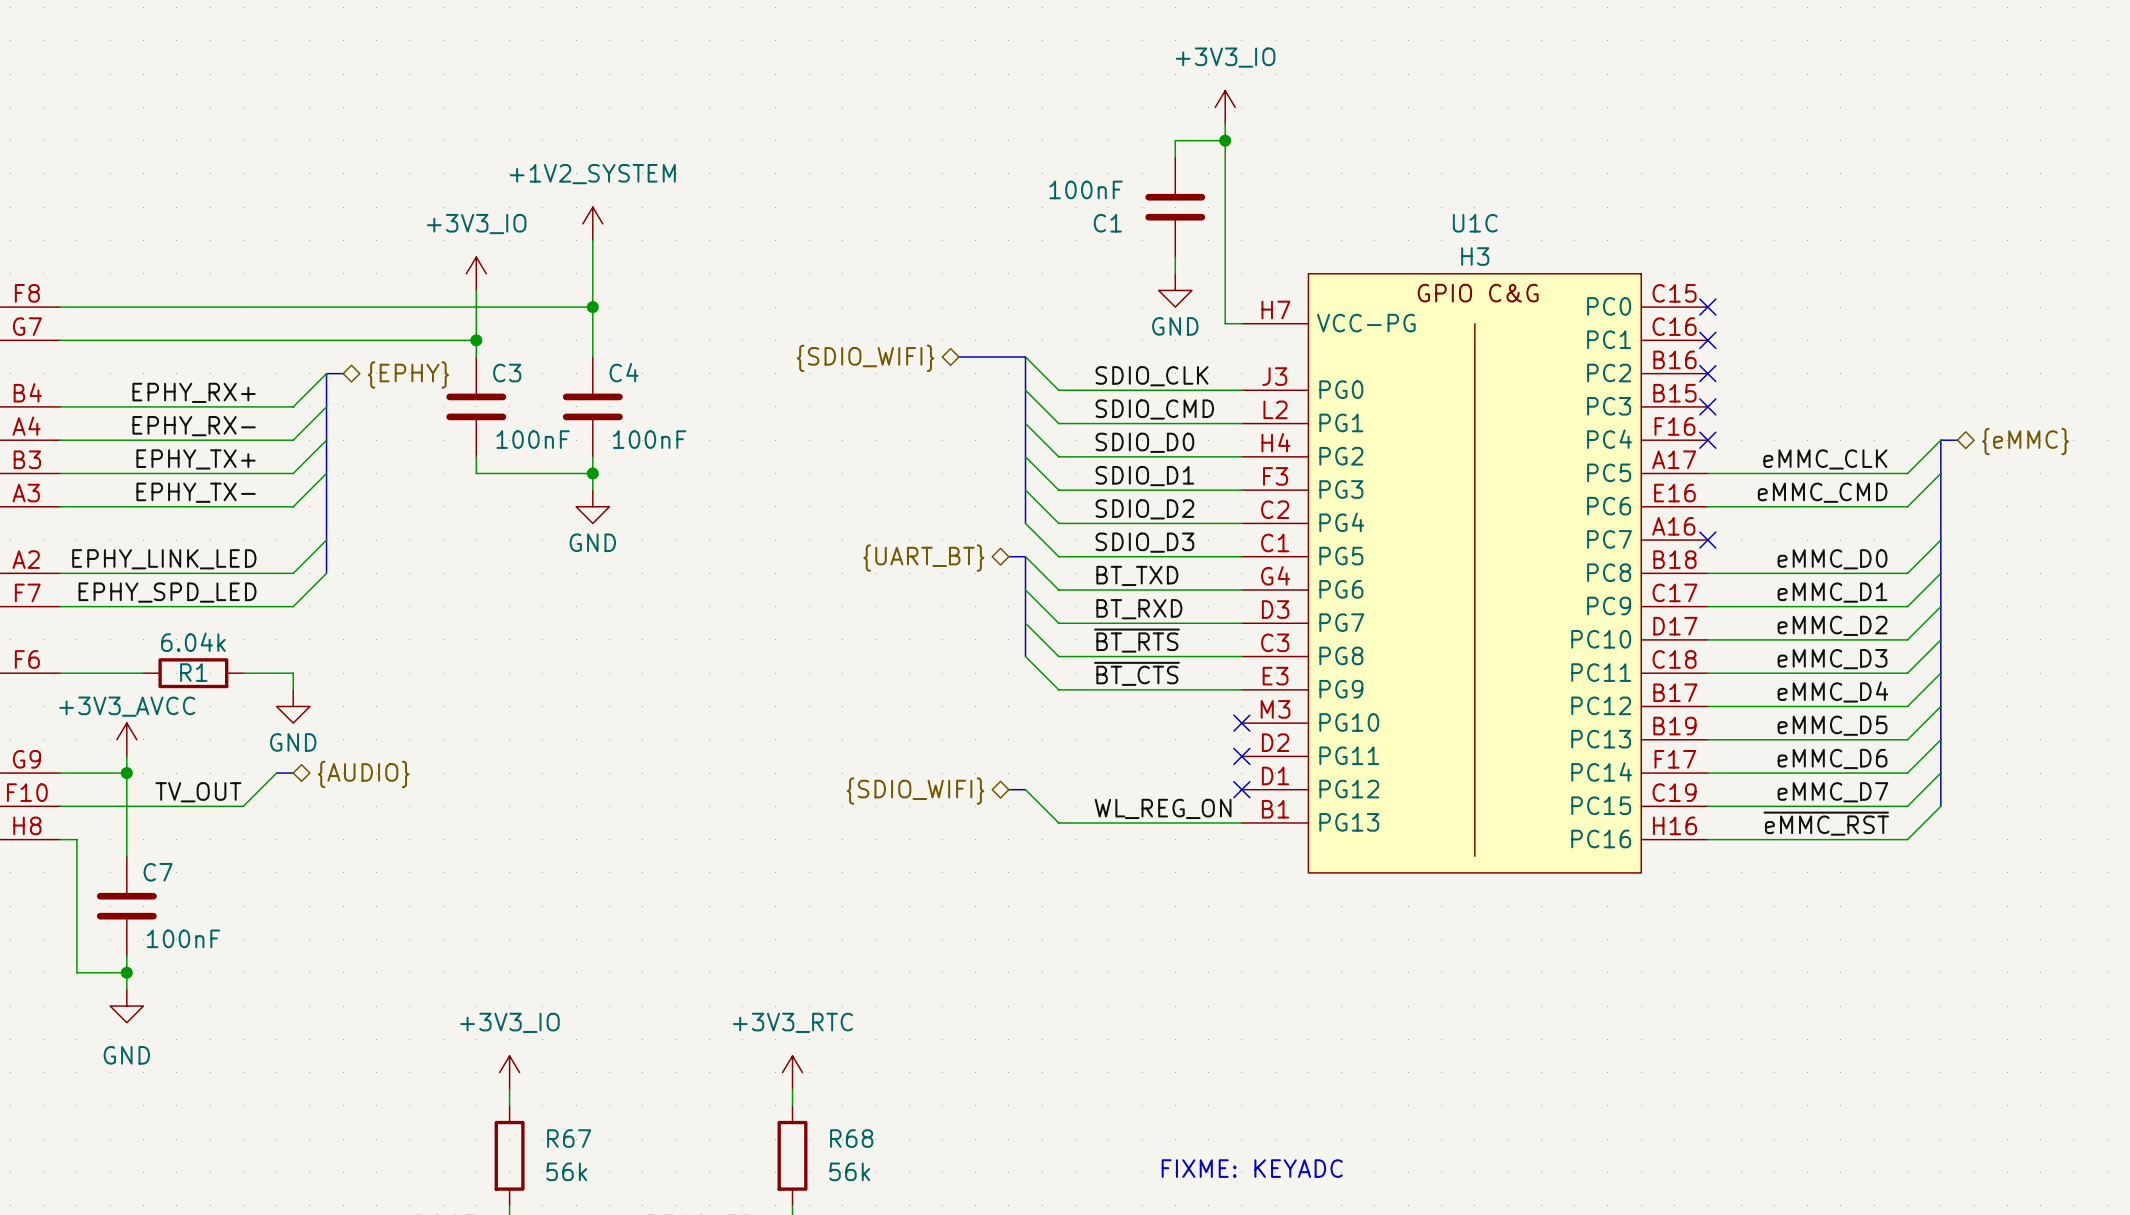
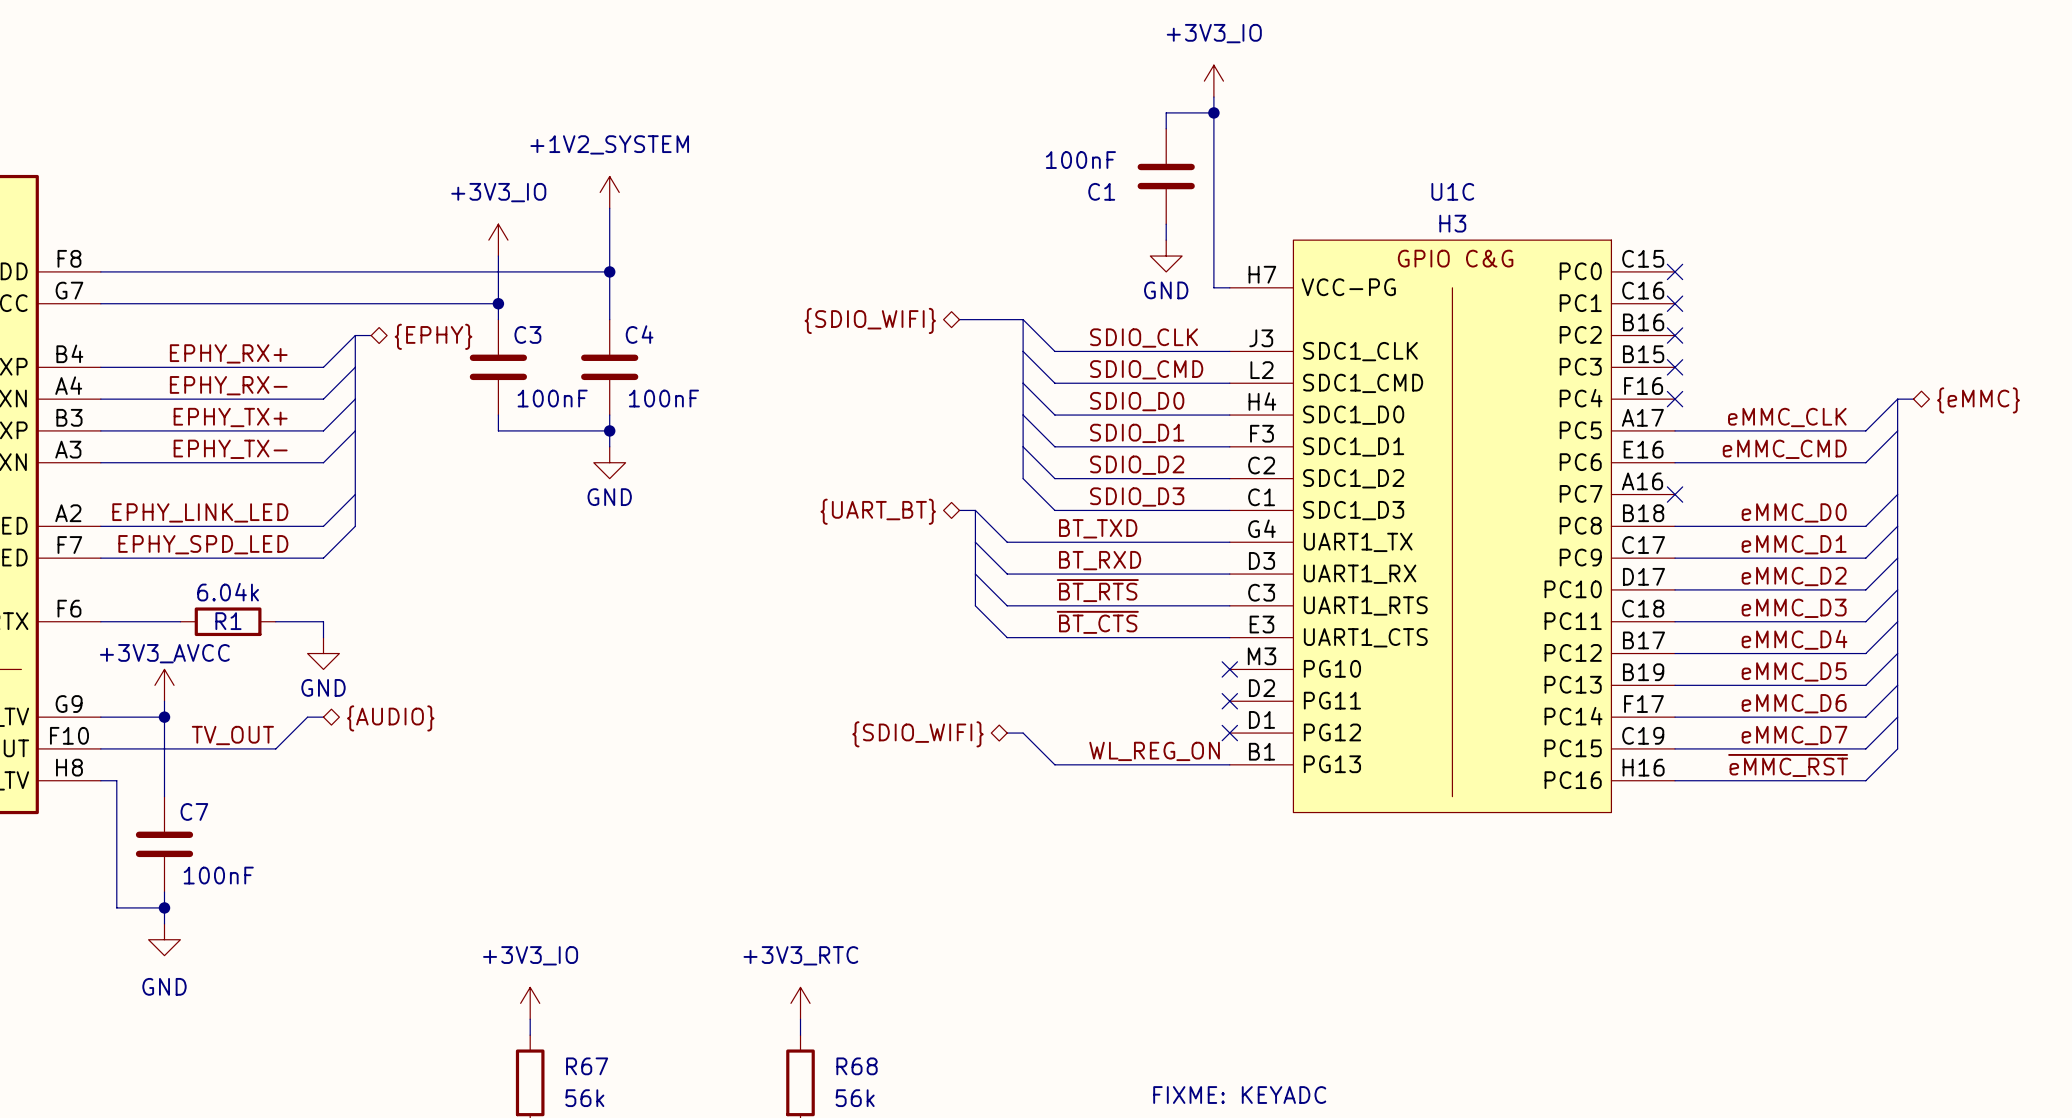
U1C symbol: [1241, 273, 1708, 873] -> [1229, 240, 1676, 813]
bus: (1008, 556) (1025, 556) (1025, 656) -> (959, 510) (975, 510) (975, 605)
wire: (1025, 556) (1058, 589) -> (975, 510) (1007, 542) (1054, 542)
hierarchical label position: {UART_BT} (923, 558) -> {UART_BT} (878, 511)
label position: BT_TXD (1137, 575) -> BT_TXD (1098, 528)
wire: (1025, 589) (1058, 623) -> (975, 542) (1007, 574) (1054, 574)
label position: BT_RXD (1139, 609) -> BT_RXD (1100, 560)
wire: (1025, 623) (1058, 656) -> (975, 574) (1007, 605) (1054, 605)
label position: ~{BT_RTS} (1136, 640) -> ~{BT_RTS} (1097, 590)
wire: (1025, 656) (1058, 689) -> (975, 605) (1007, 637) (1054, 637)
label position: ~{BT_CTS} (1136, 673) -> ~{BT_CTS} (1097, 622)

